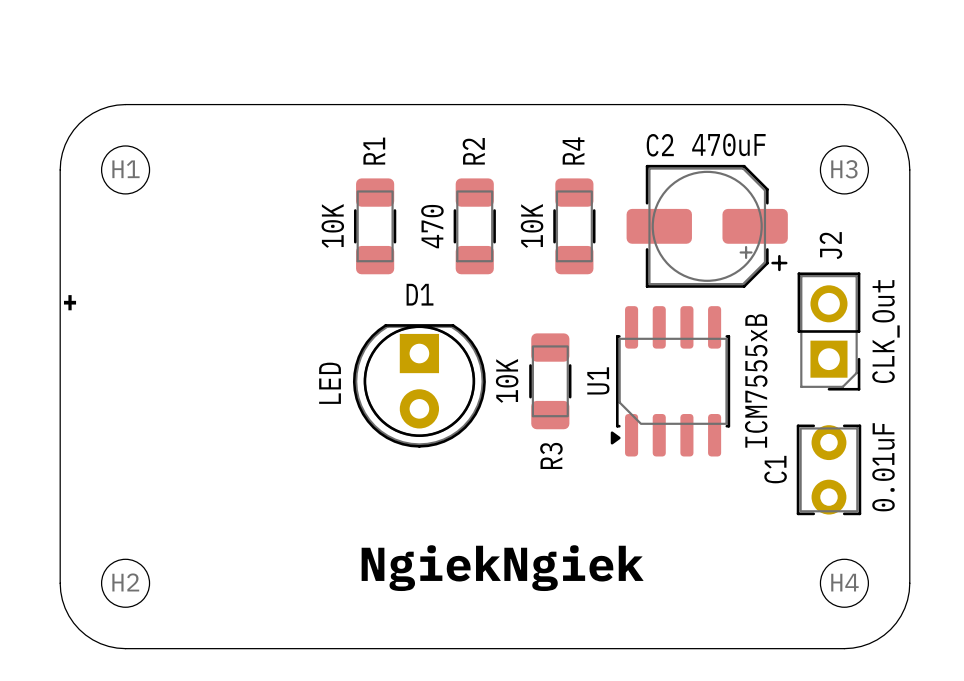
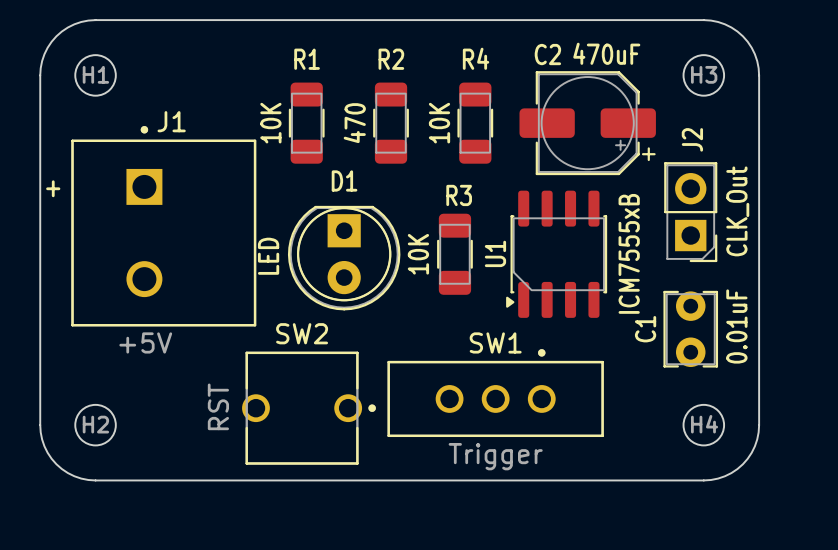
R4 name rotation: 0° (573, 150) -> 90° clockwise (476, 58)
R1 name rotation: 0° (374, 151) -> 90° clockwise (307, 59)
R2 name rotation: 0° (473, 151) -> 90° clockwise (391, 59)
J1: none -> +5V (163, 226)
R3 name rotation: 0° (551, 455) -> 90° clockwise (459, 195)
R3 name position: R3 (551, 455) -> R3 (459, 195)
SW1: none -> Trigger (495, 393)
SW2: none -> RST (308, 408)
text: NgiekNgiek (502, 568) -> none

